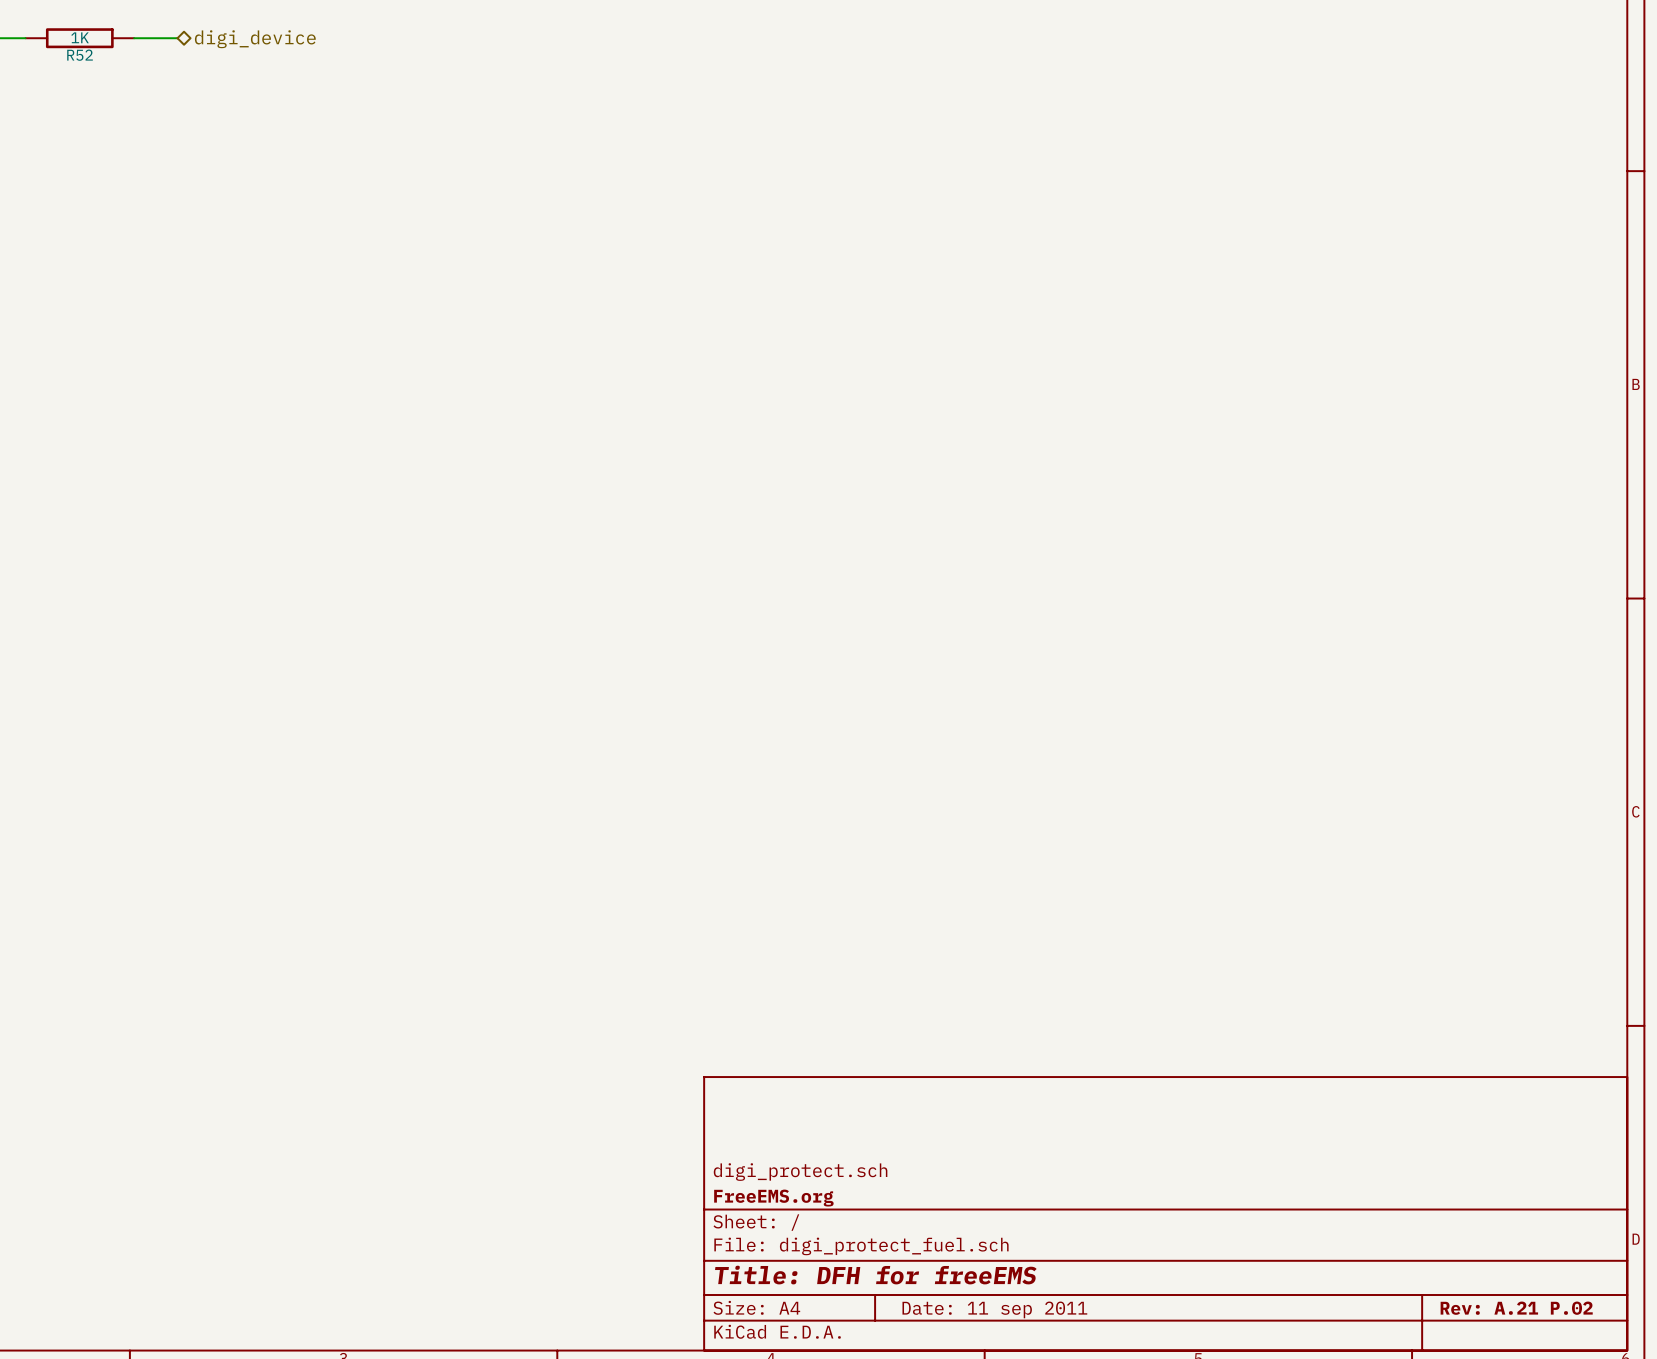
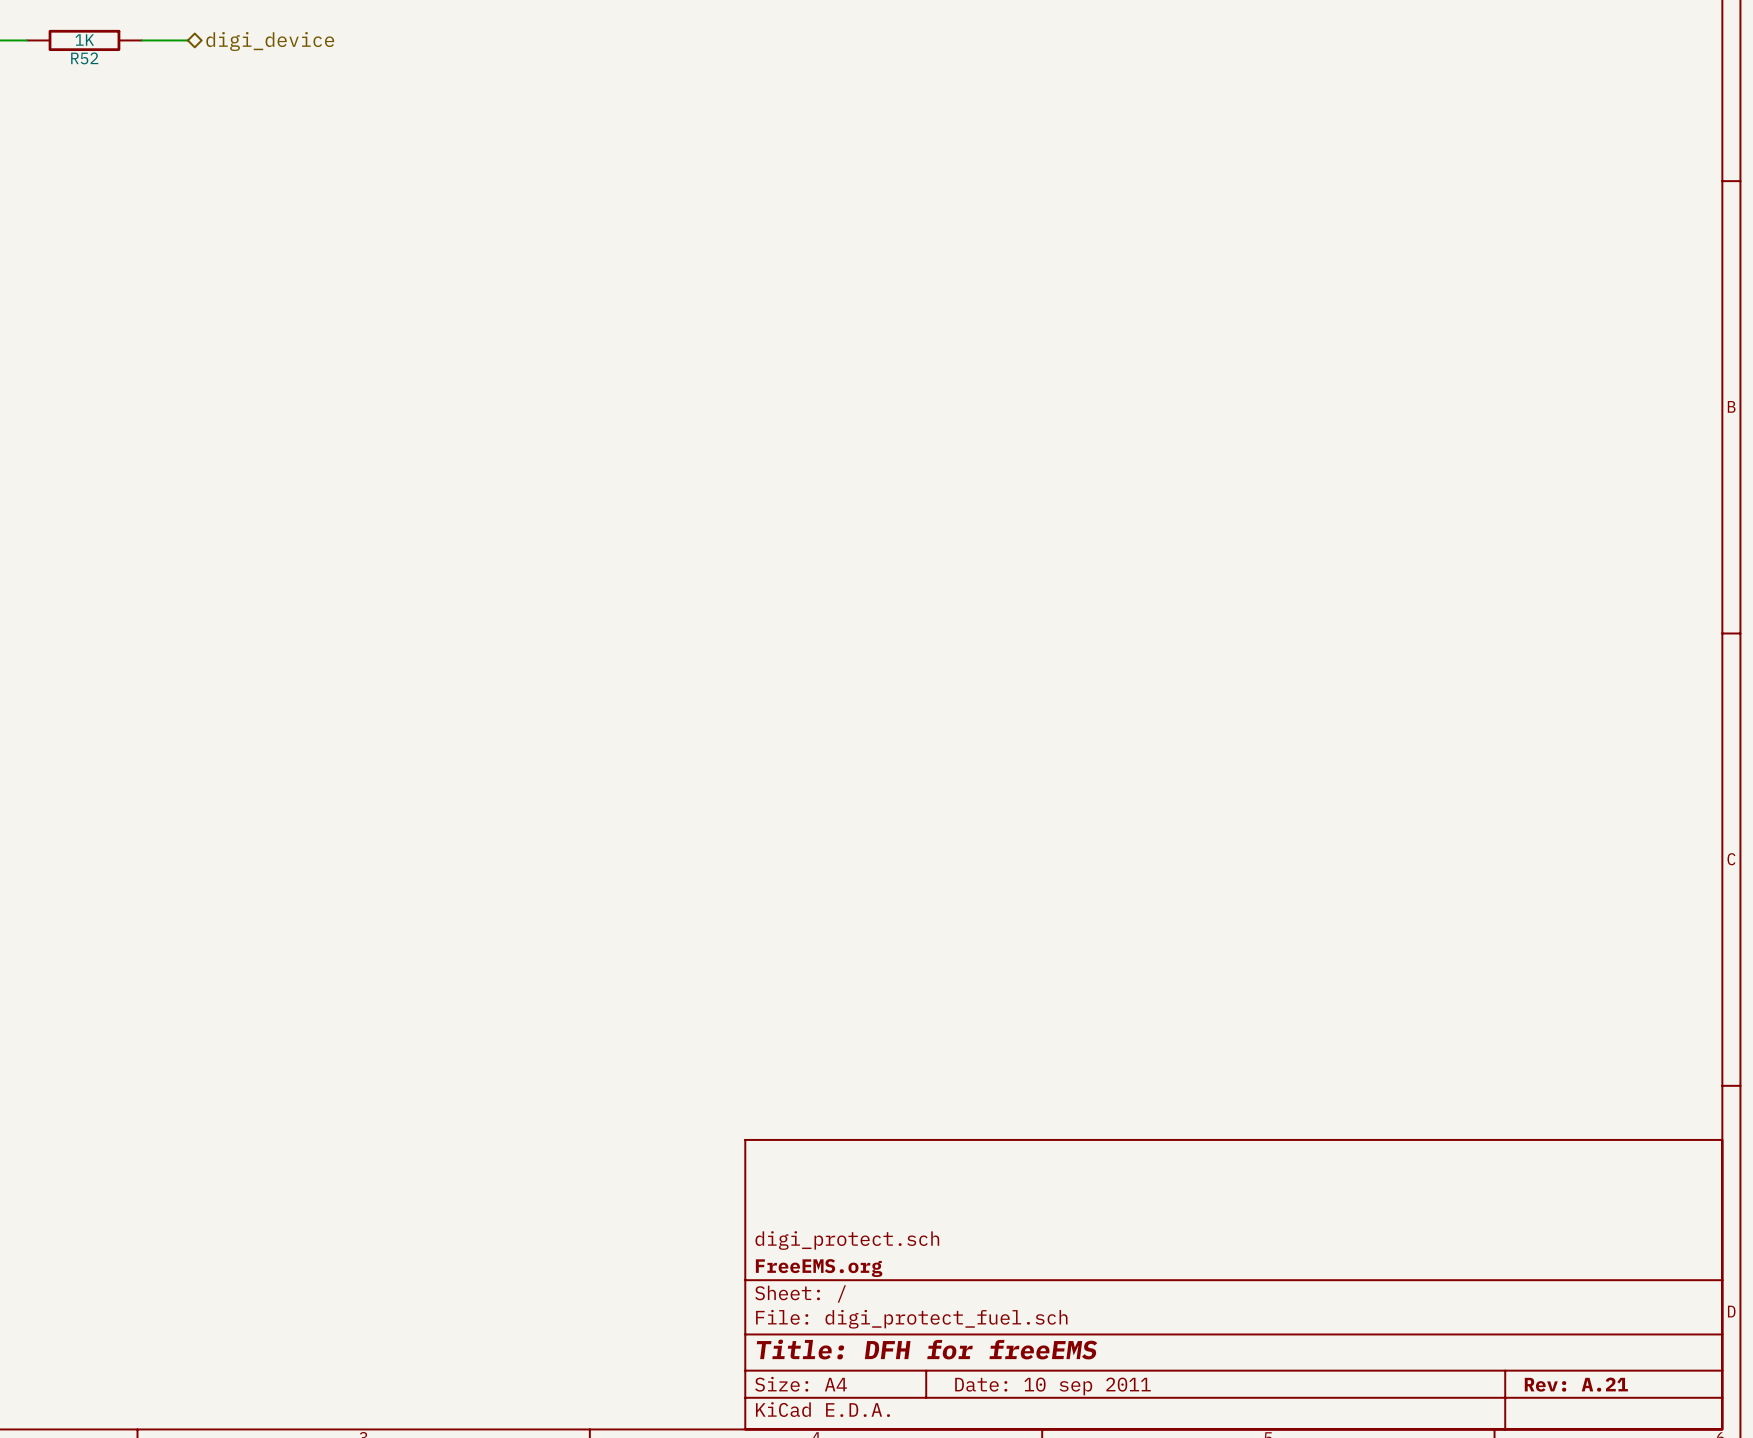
title block: Rev: A.21 P.02 (1516, 1308) -> Rev: A.21 (1576, 1384)
title block: Date: 11 sep 2011 (994, 1309) -> Date: 10 sep 2011 (1052, 1386)

